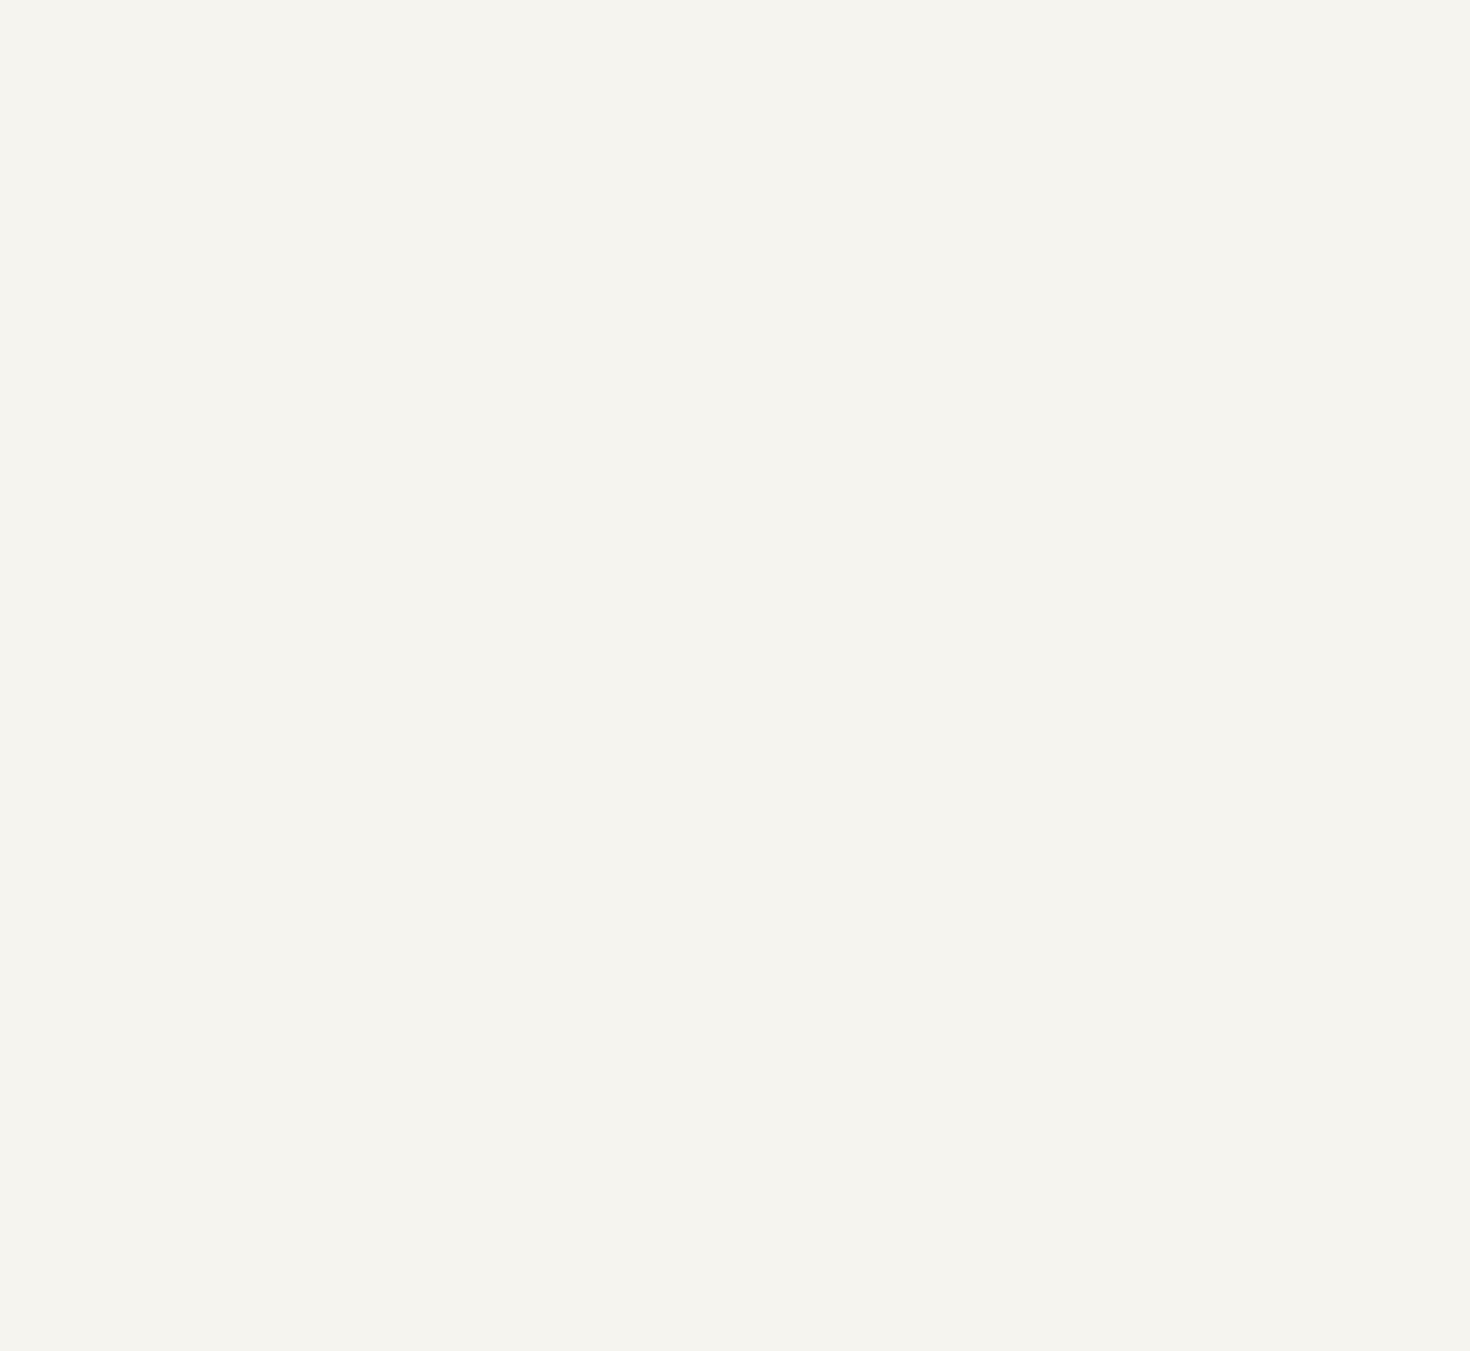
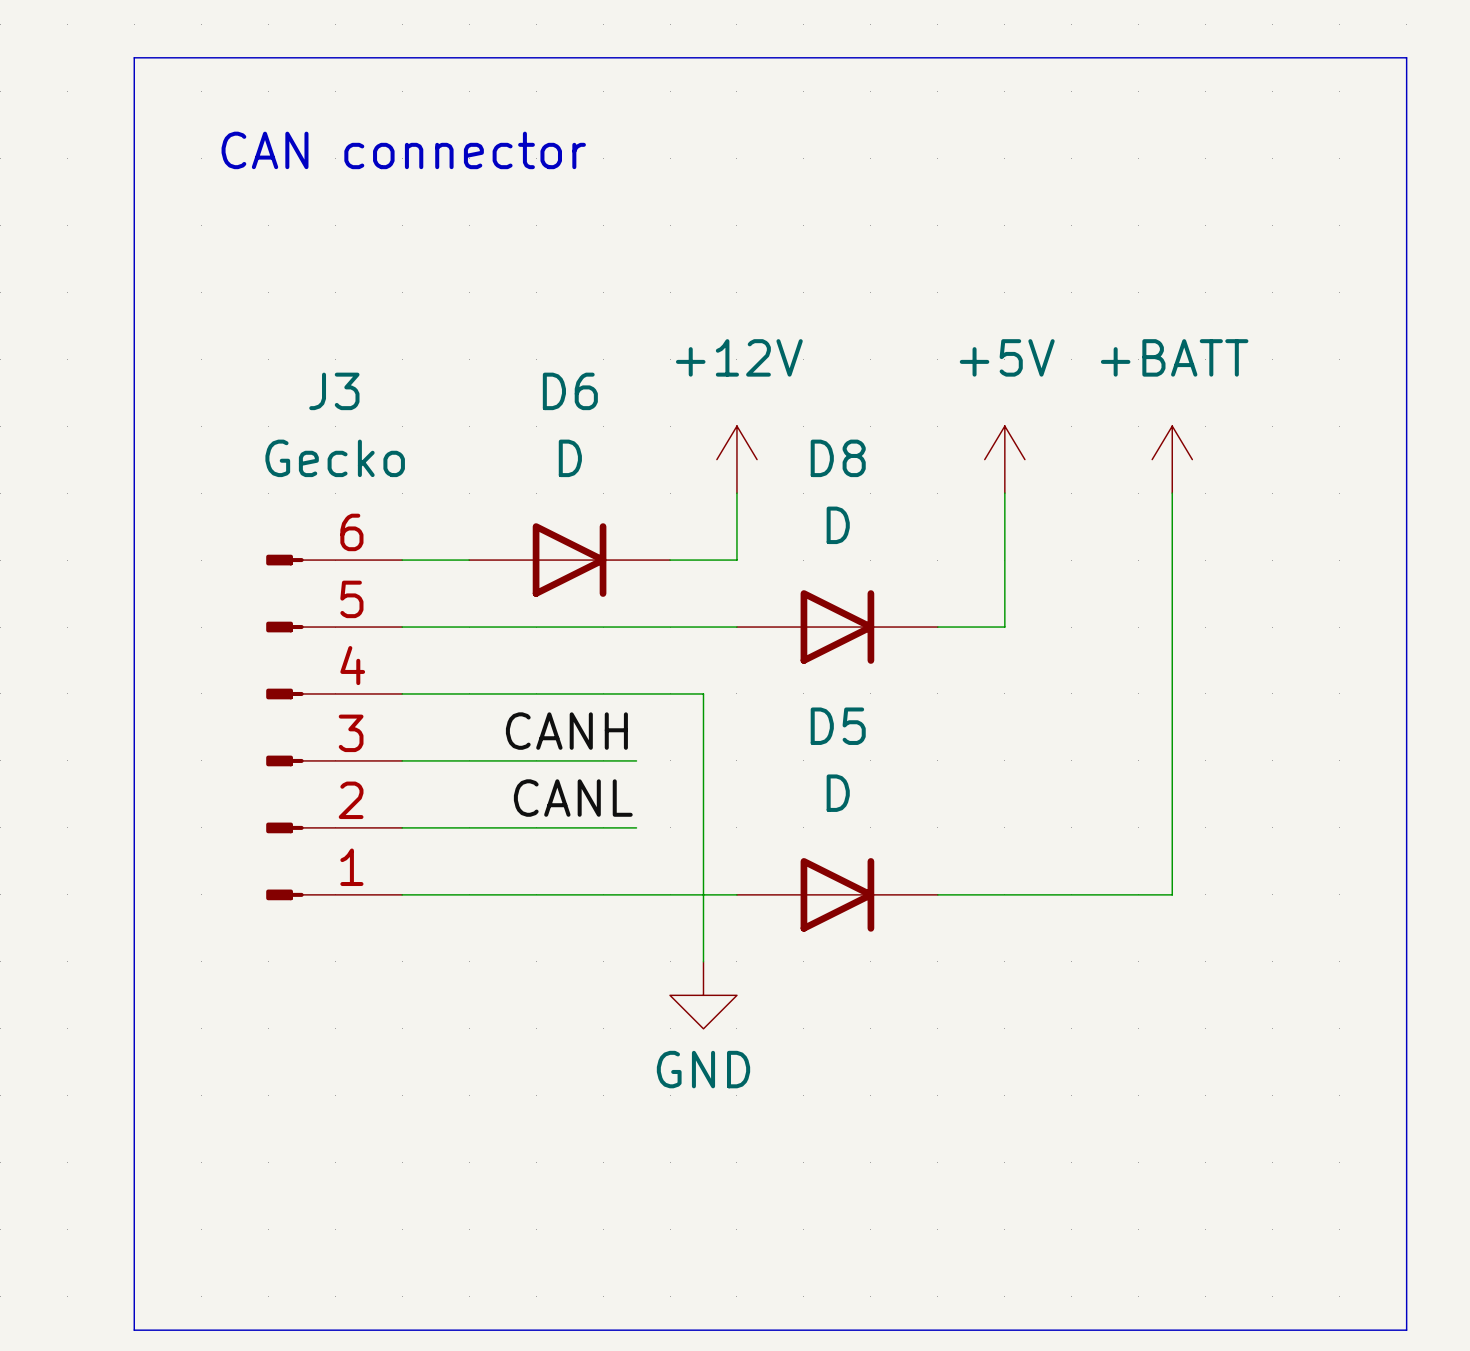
line: none -> (134, 57) (1406, 57) (1406, 1330) (134, 1330) (134, 57)
text: none -> CAN connector (403, 150)
power symbol: none -> +12V (736, 459)
power symbol: none -> +5V (1004, 459)
power symbol: none -> +BATT (1172, 459)
wire: none -> (736, 493) (736, 560) (670, 560)
wire: none -> (1004, 493) (1004, 627) (937, 627)
wire: none -> (1172, 493) (1172, 894) (937, 894)
wire: none -> (402, 560) (469, 560)
D6: none -> D (569, 560)
wire: none -> (402, 627) (736, 627)
D8: none -> D (837, 627)
wire: none -> (402, 693) (703, 693) (703, 961)
J3: none -> Gecko (334, 727)
label: none -> CANH (566, 731)
wire: none -> (402, 760) (636, 760)
label: none -> CANL (573, 798)
wire: none -> (402, 827) (636, 827)
wire: none -> (402, 894) (736, 894)
D5: none -> D (837, 894)
power symbol: none -> GND (703, 995)

